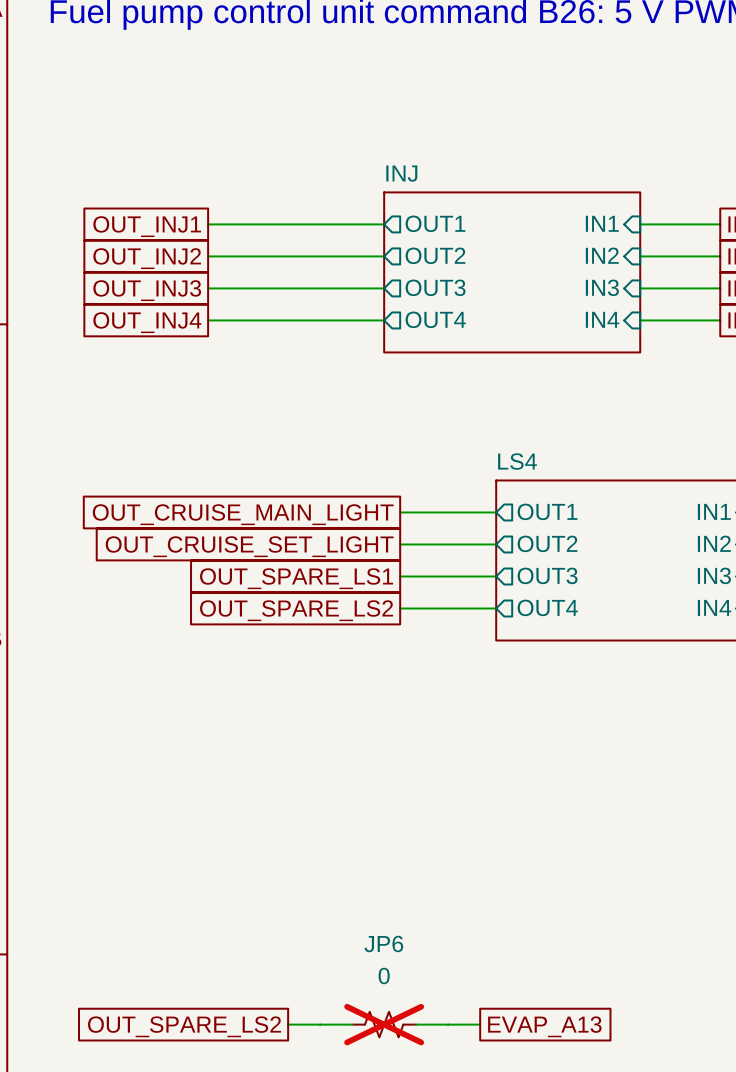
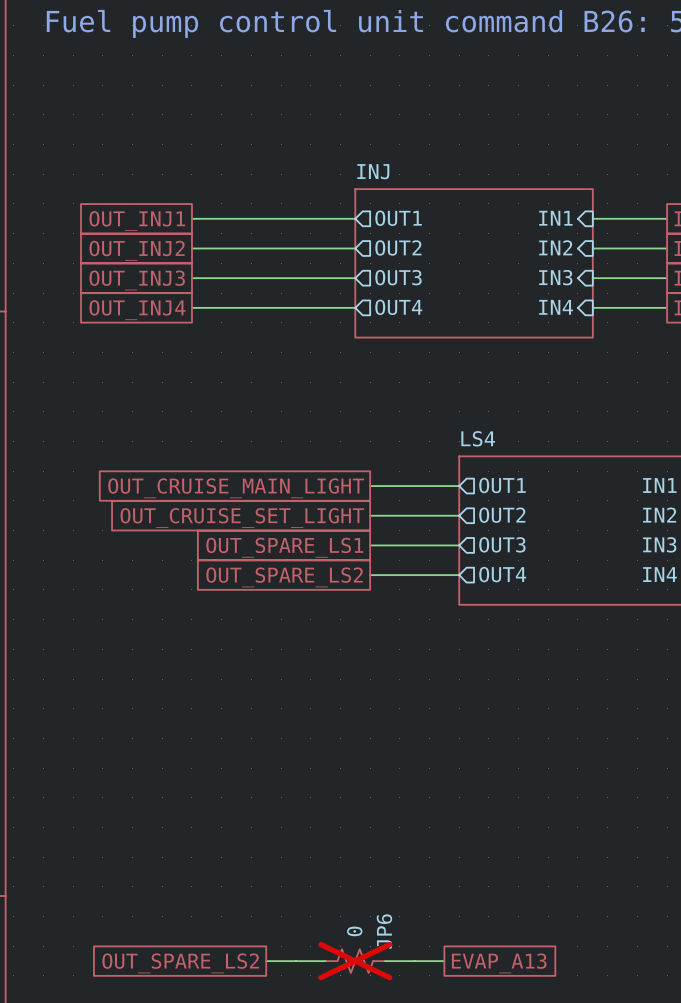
JP6 name rotation: 0° (383, 943) -> 90° counterclockwise (384, 931)
JP6 name position: JP6 (383, 943) -> JP6 (384, 931)
JP6 value rotation: 0° (384, 976) -> 90° counterclockwise (354, 931)

